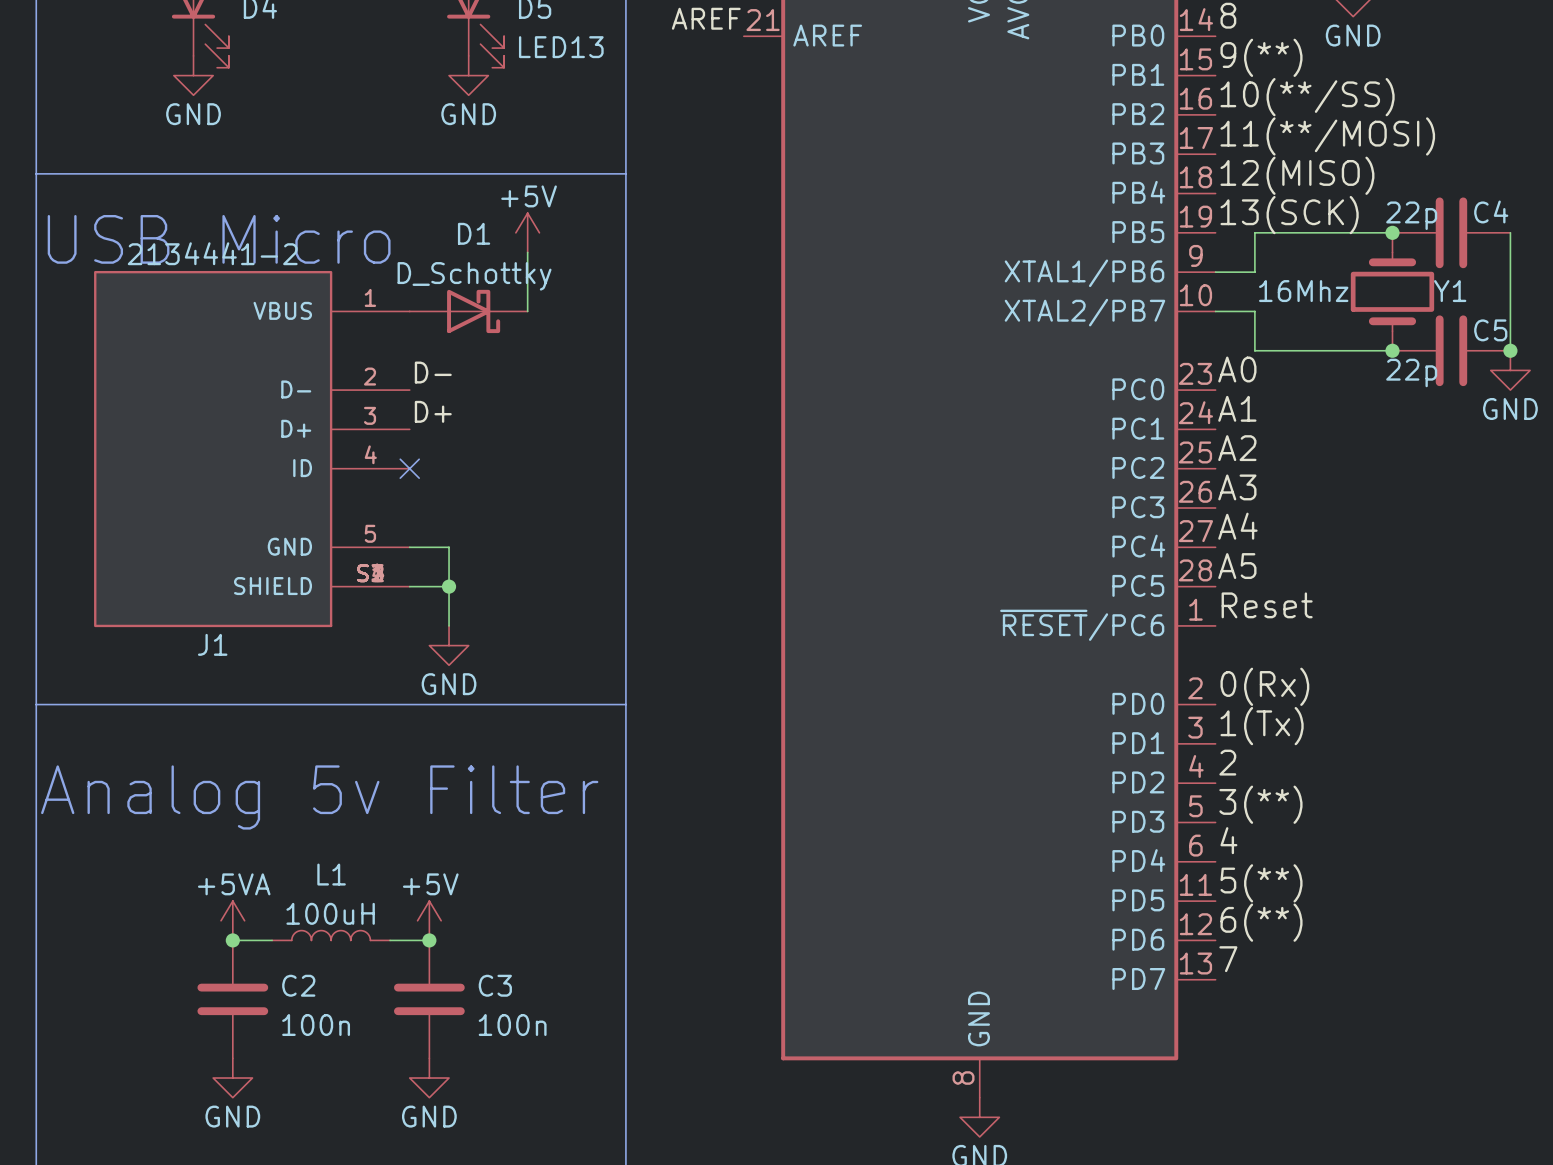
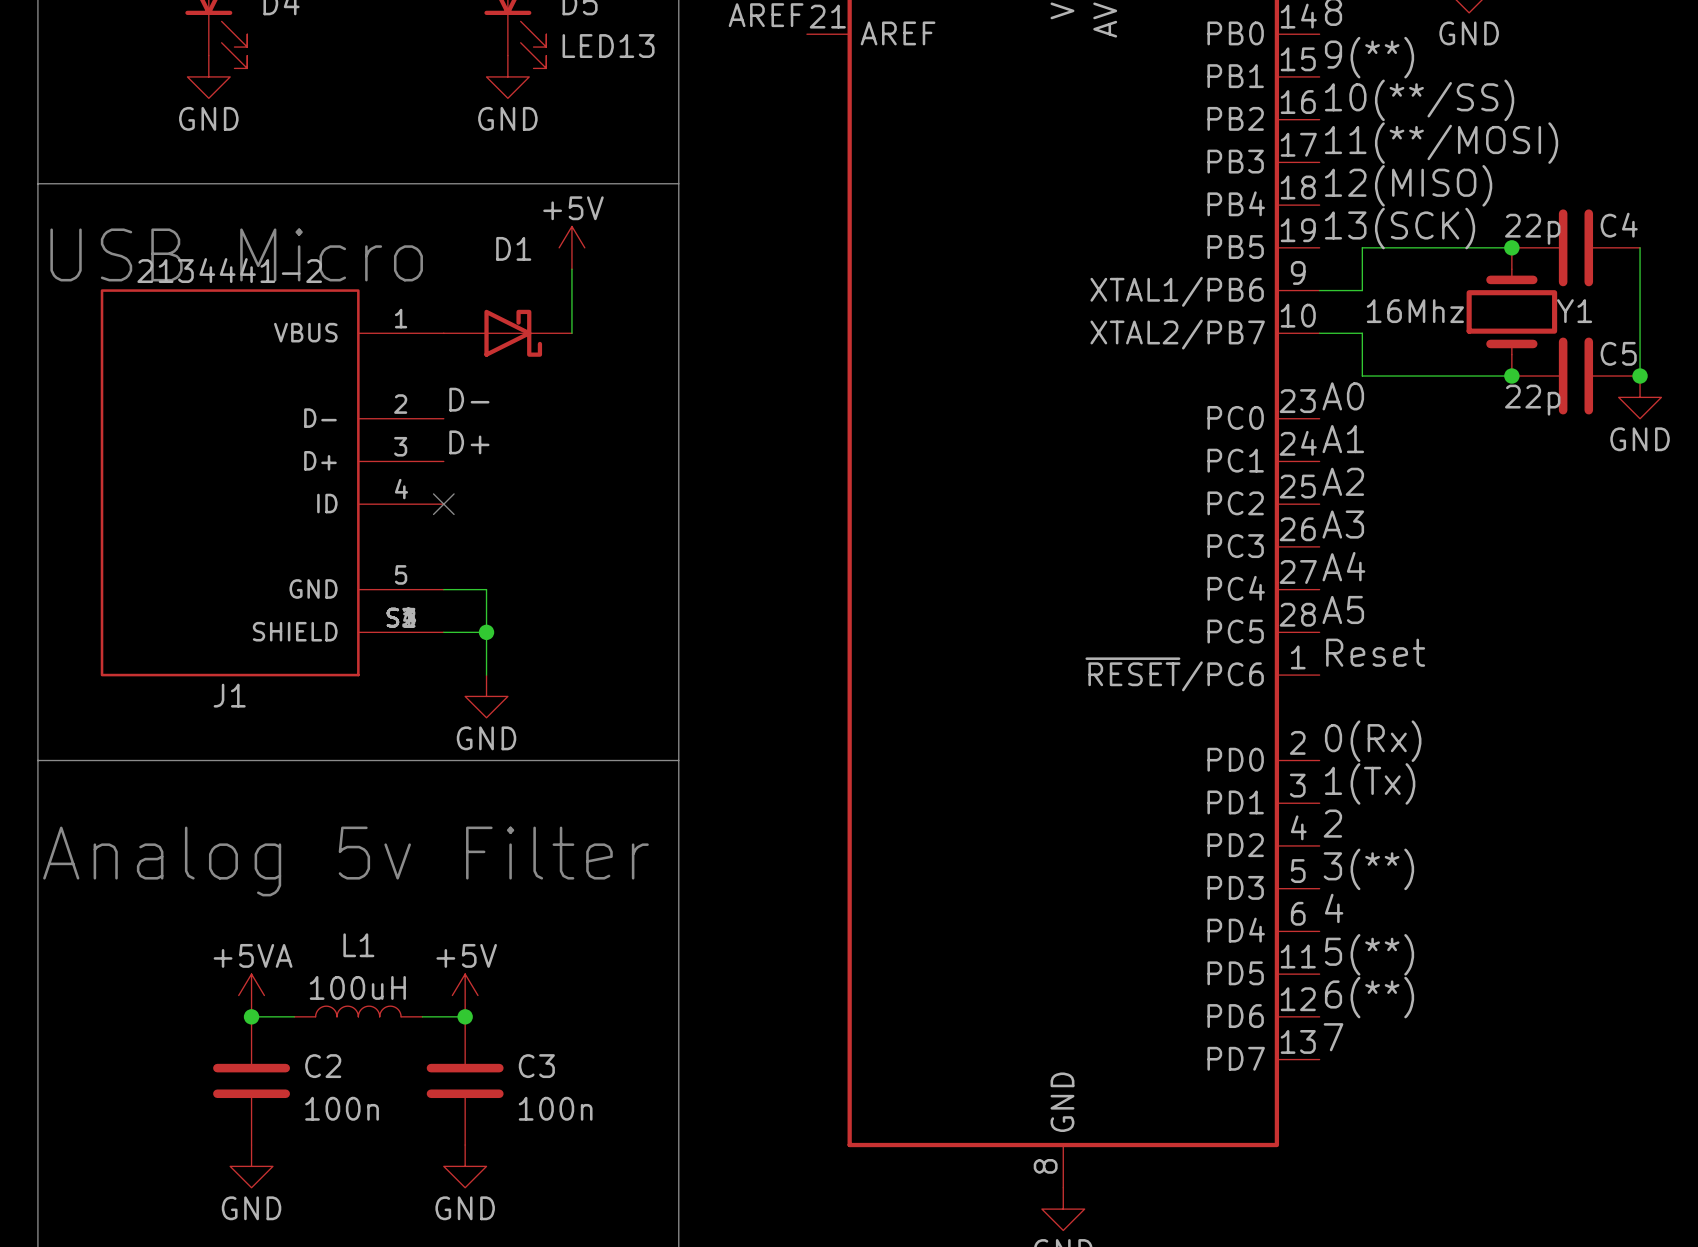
D1 value: D_Schottky (474, 276) -> none

